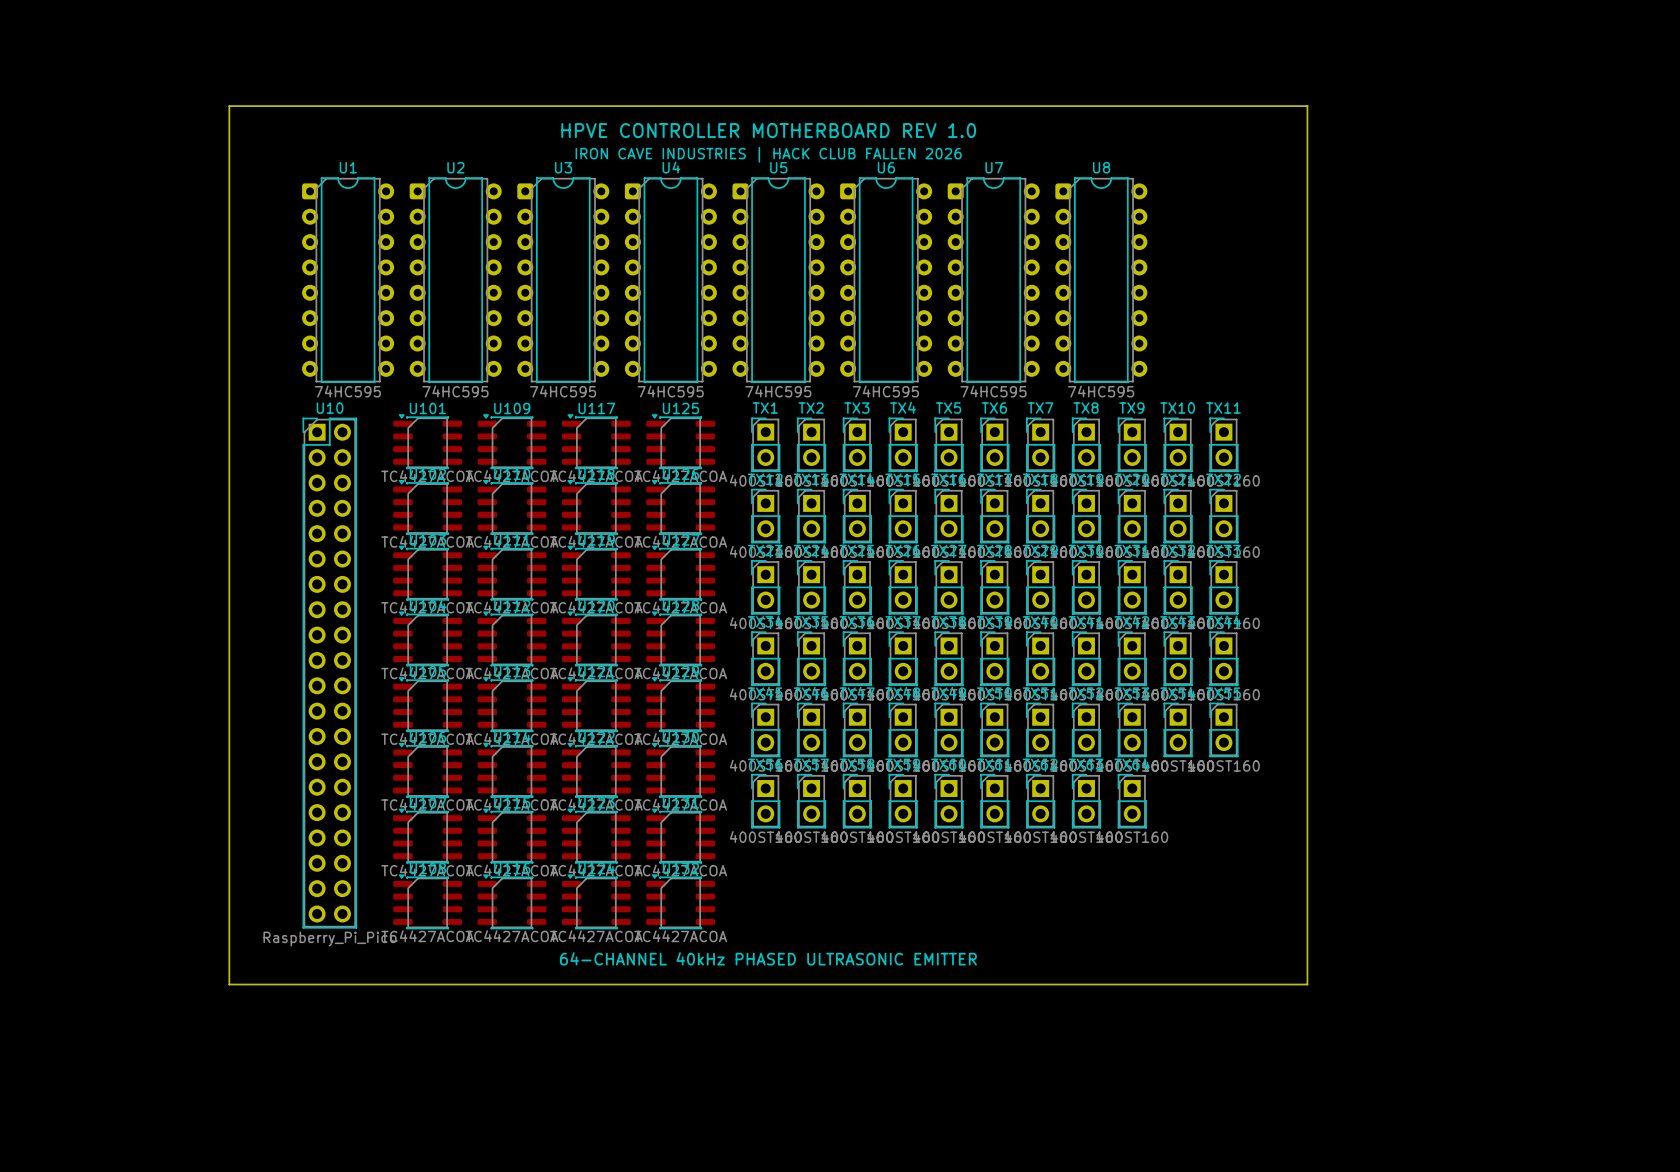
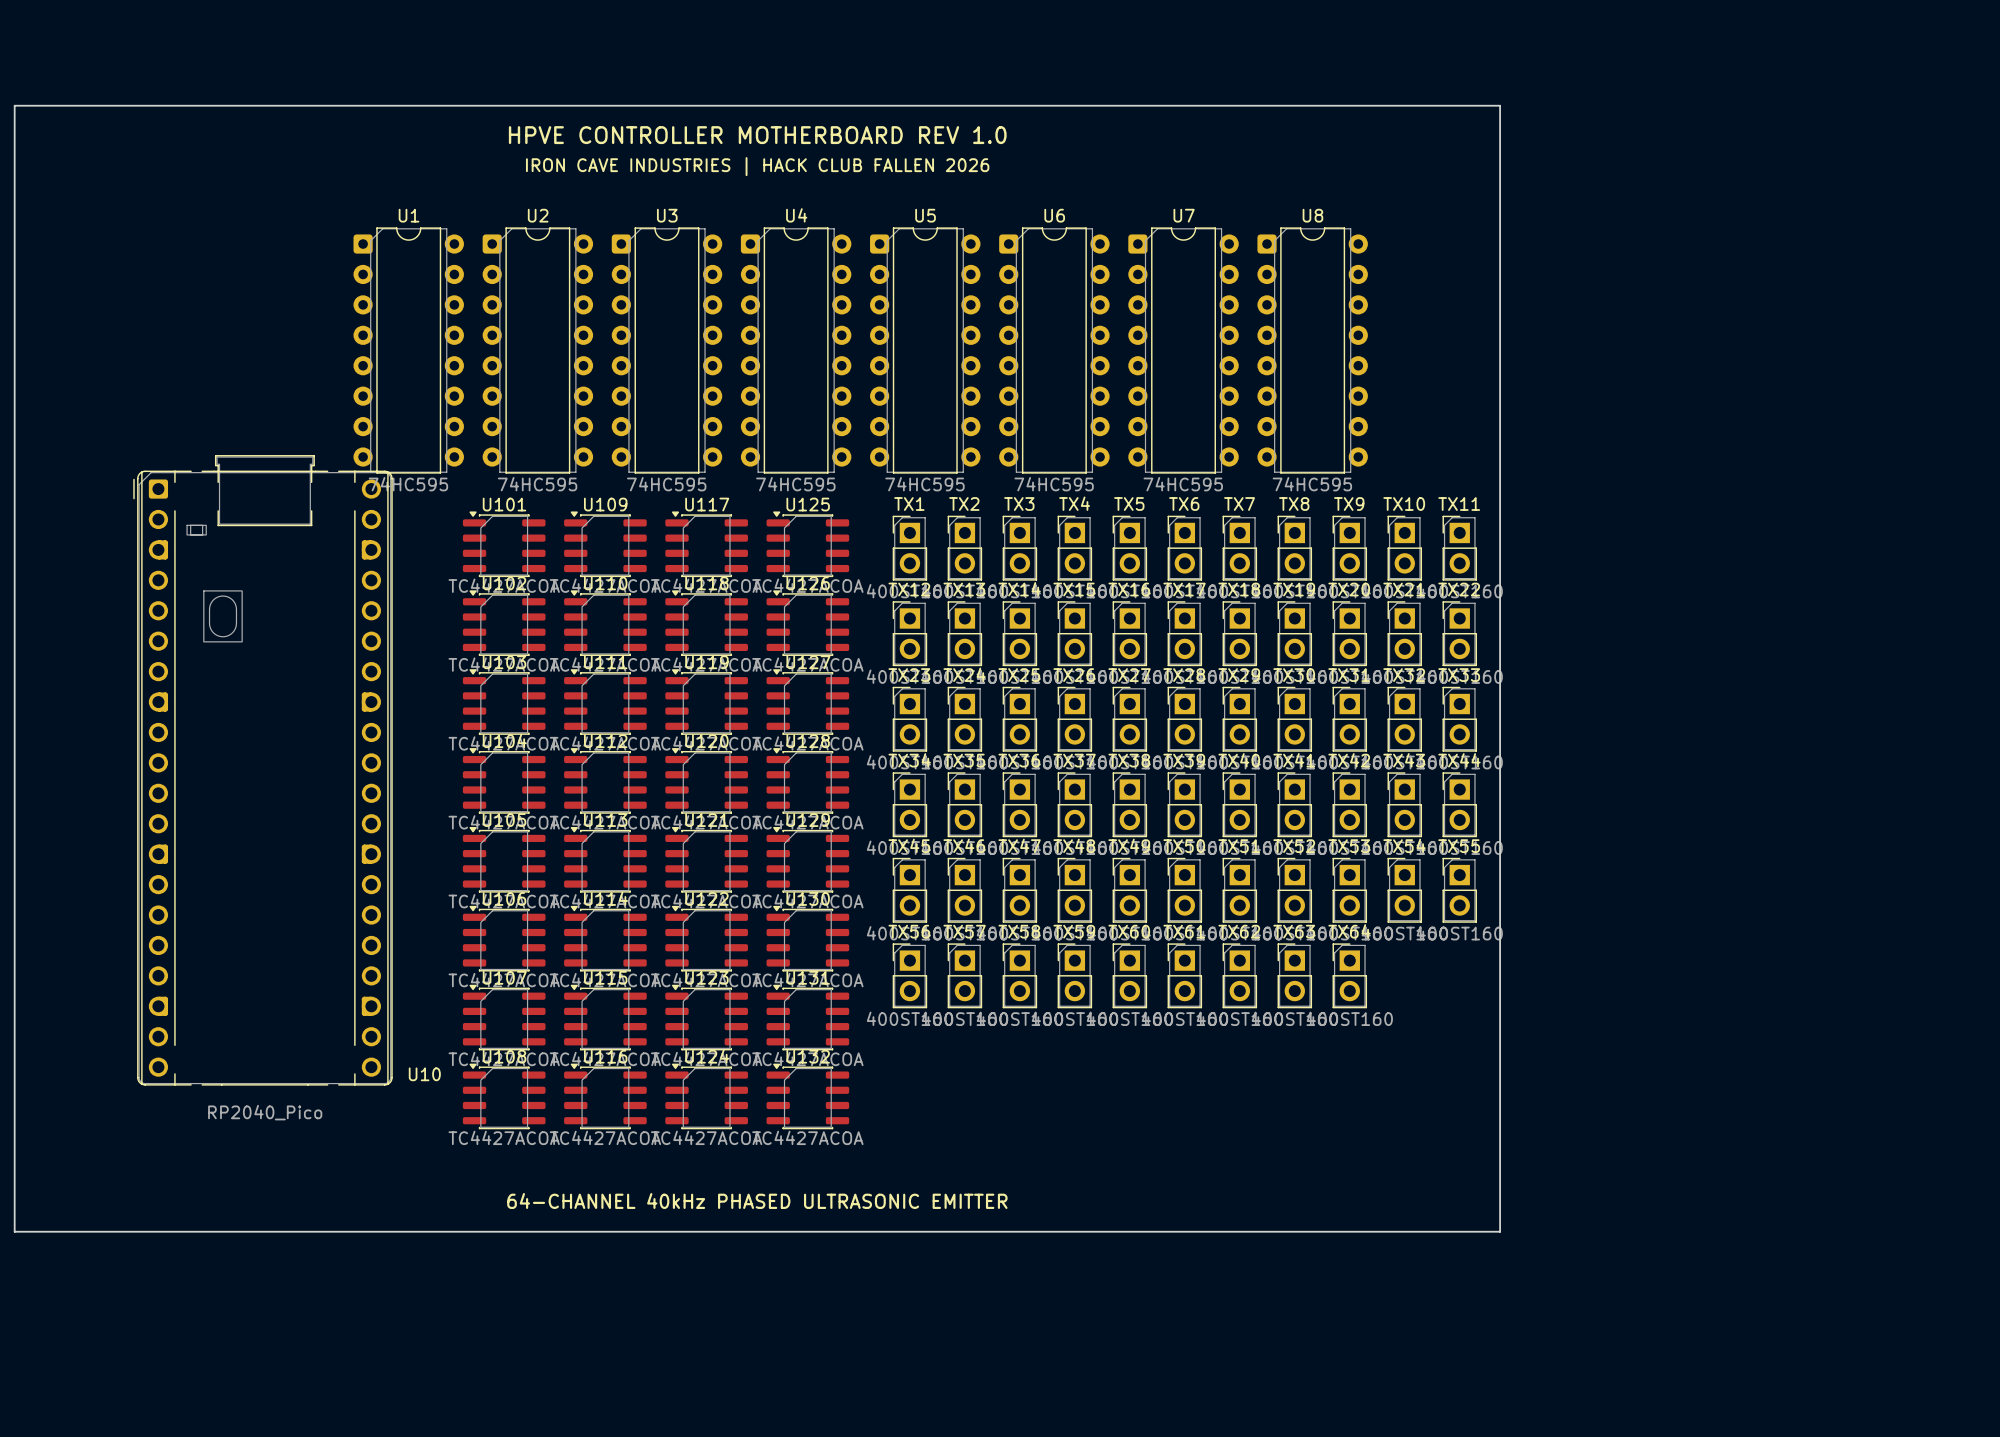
board edge: (229, 106) (1307, 106) (1307, 984) (229, 984) (229, 106) -> (14, 105) (14, 1231) (1500, 1231) (1500, 105) (14, 105)
text position: HPVE CONTROLLER MOTHERBOARD REV 1.0 (768, 130) -> HPVE CONTROLLER MOTHERBOARD REV 1.0 (757, 135)
text position: IRON CAVE INDUSTRIES | HACK CLUB FALLEN 2026 (768, 154) -> IRON CAVE INDUSTRIES | HACK CLUB FALLEN 2026 (757, 166)
U10 name position: U10 (330, 408) -> U10 (424, 1074)
U10 footprint: [302, 417, 357, 929] -> [133, 455, 393, 1086]
U10 value: Raspberry_Pi_Pico (330, 939) -> RP2040_Pico (265, 1112)
text position: 64-CHANNEL 40kHz PHASED ULTRASONIC EMITTER (768, 958) -> 64-CHANNEL 40kHz PHASED ULTRASONIC EMITTER (757, 1201)

